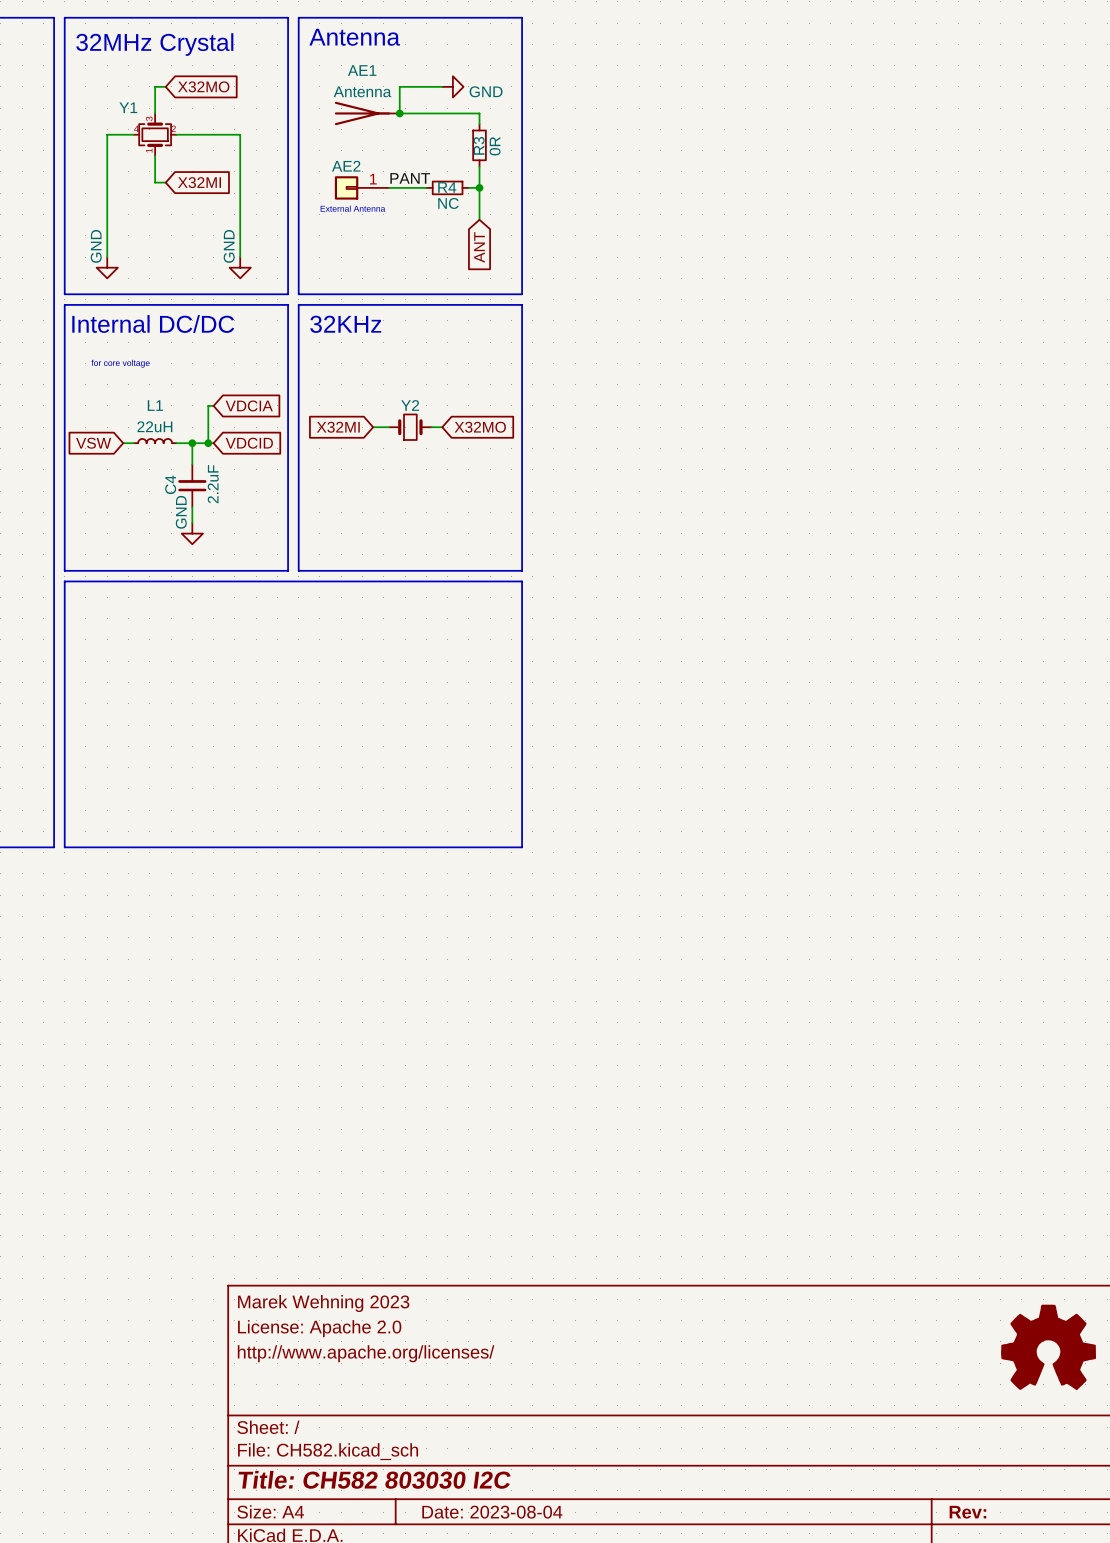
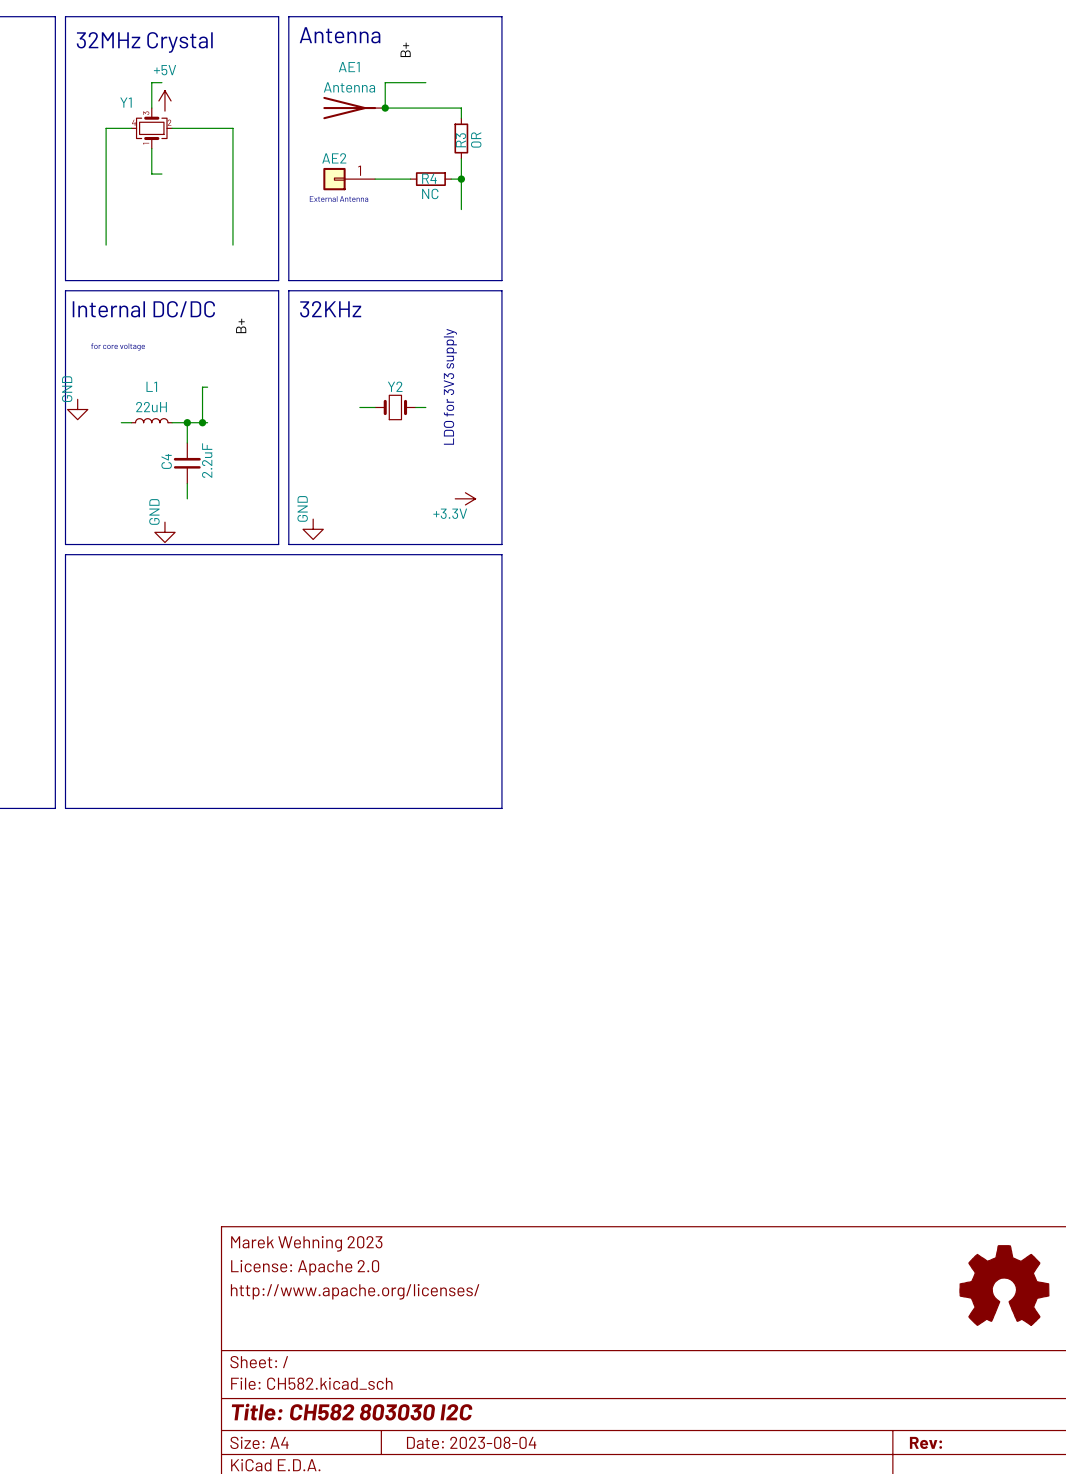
label: none -> B+ (405, 49)
global label: X32MO (203, 86) -> none
power symbol: GND (452, 86) -> none
power symbol: none -> +5V (164, 100)
label: PANT (410, 178) -> none
global label: X32MI (199, 182) -> none
global label: ANT (479, 247) -> none
power symbol: GND (107, 267) -> none
power symbol: GND (240, 267) -> none
label: none -> B+ (241, 325)
text: none -> LDO for 3V3 supply (450, 386)
global label: VDCIA (249, 405) -> none
global label: X32MI (338, 427) -> none
global label: X32MO (480, 427) -> none
power symbol: none -> GND (77, 409)
global label: VSW (93, 443) -> none
global label: VDCID (249, 443) -> none
power symbol: none -> +3.3V (465, 498)
power symbol position: GND (192, 533) -> GND (164, 532)
power symbol: none -> GND (313, 529)

